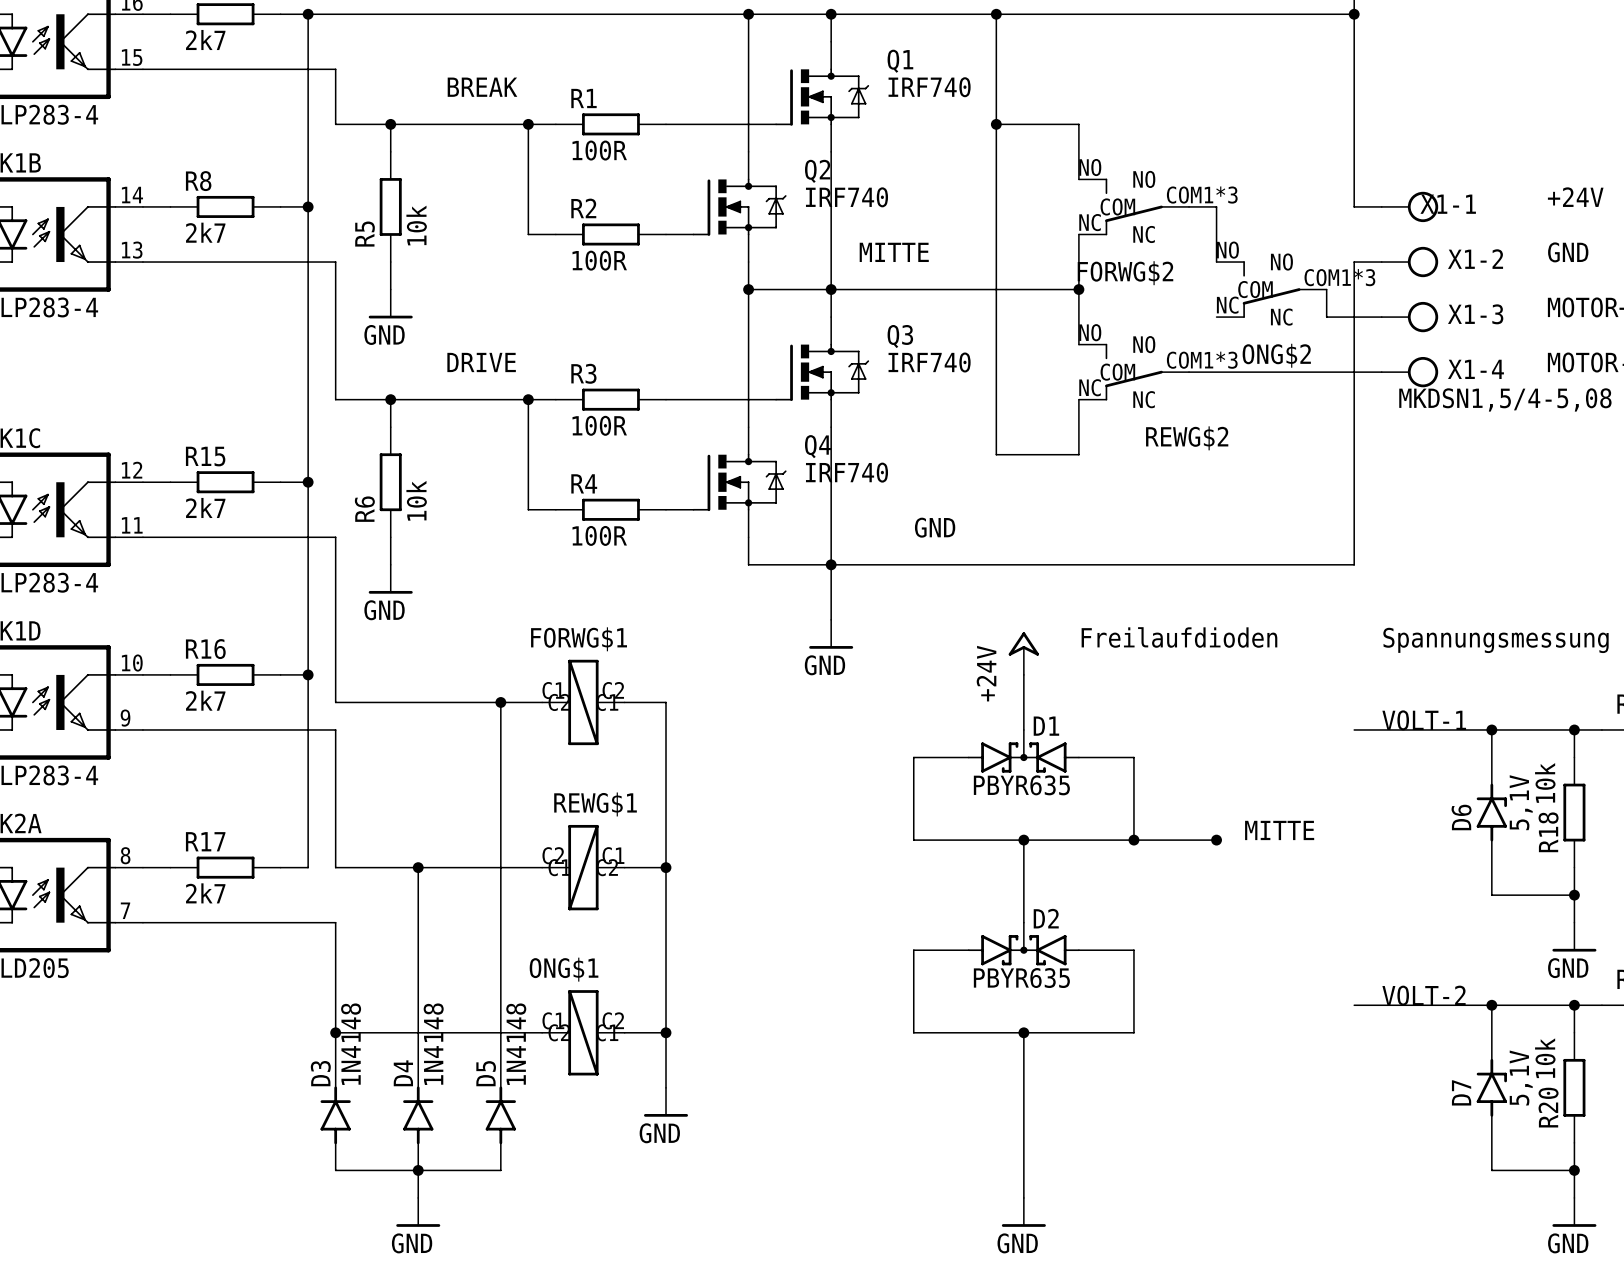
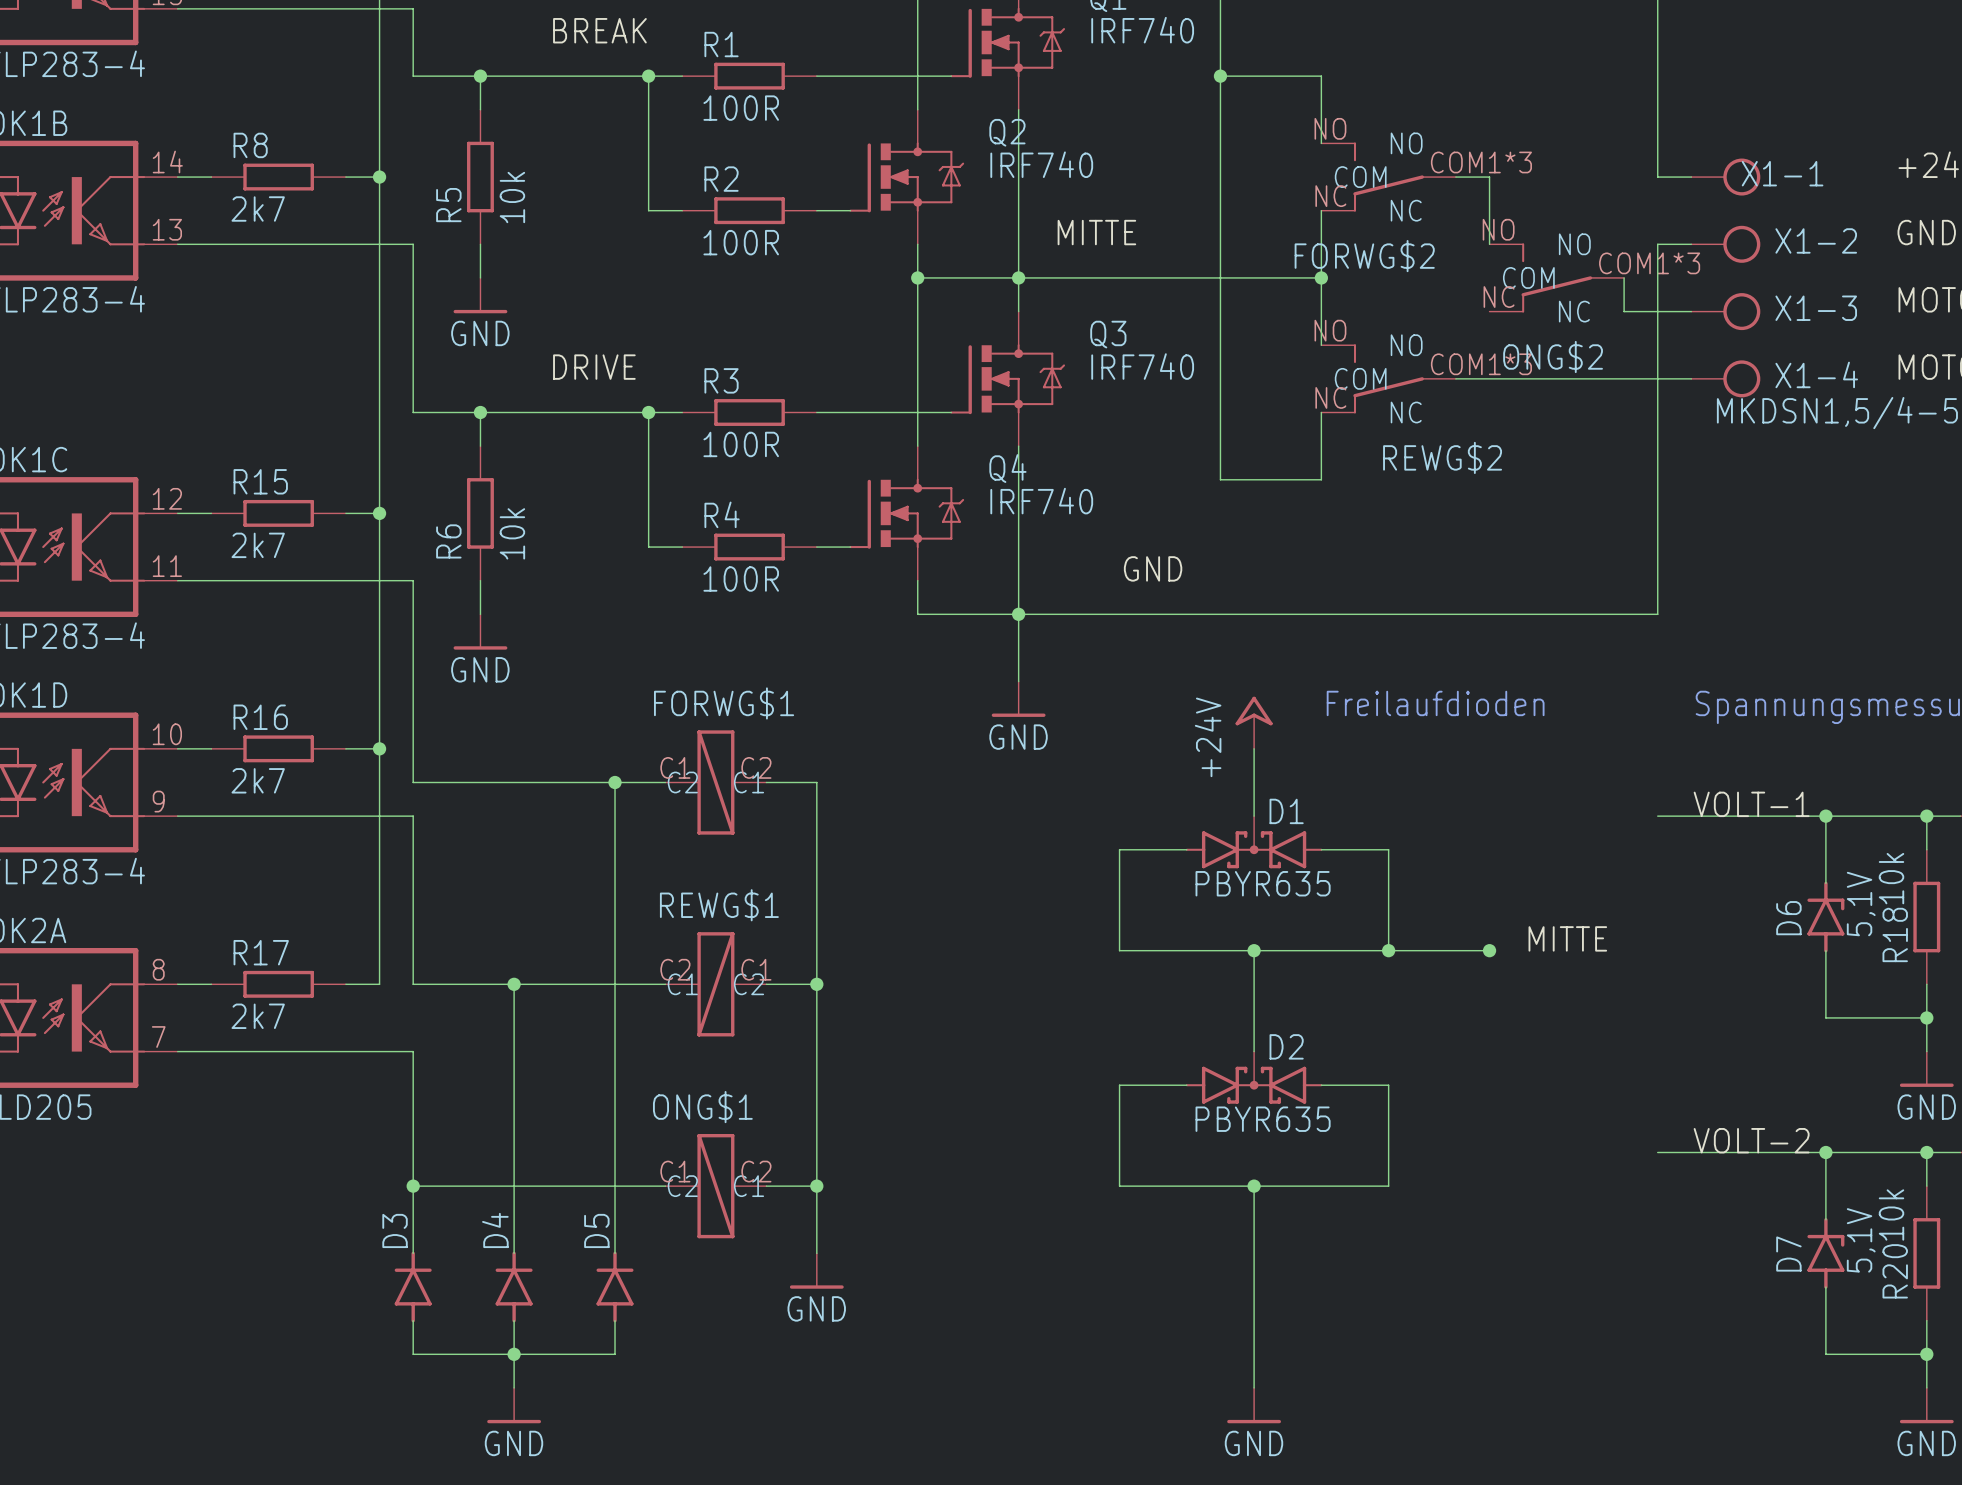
D3 value: 1N4148 (351, 1044) -> none
D4 value: 1N4148 (433, 1044) -> none
D5 value: 1N4148 (516, 1044) -> none

